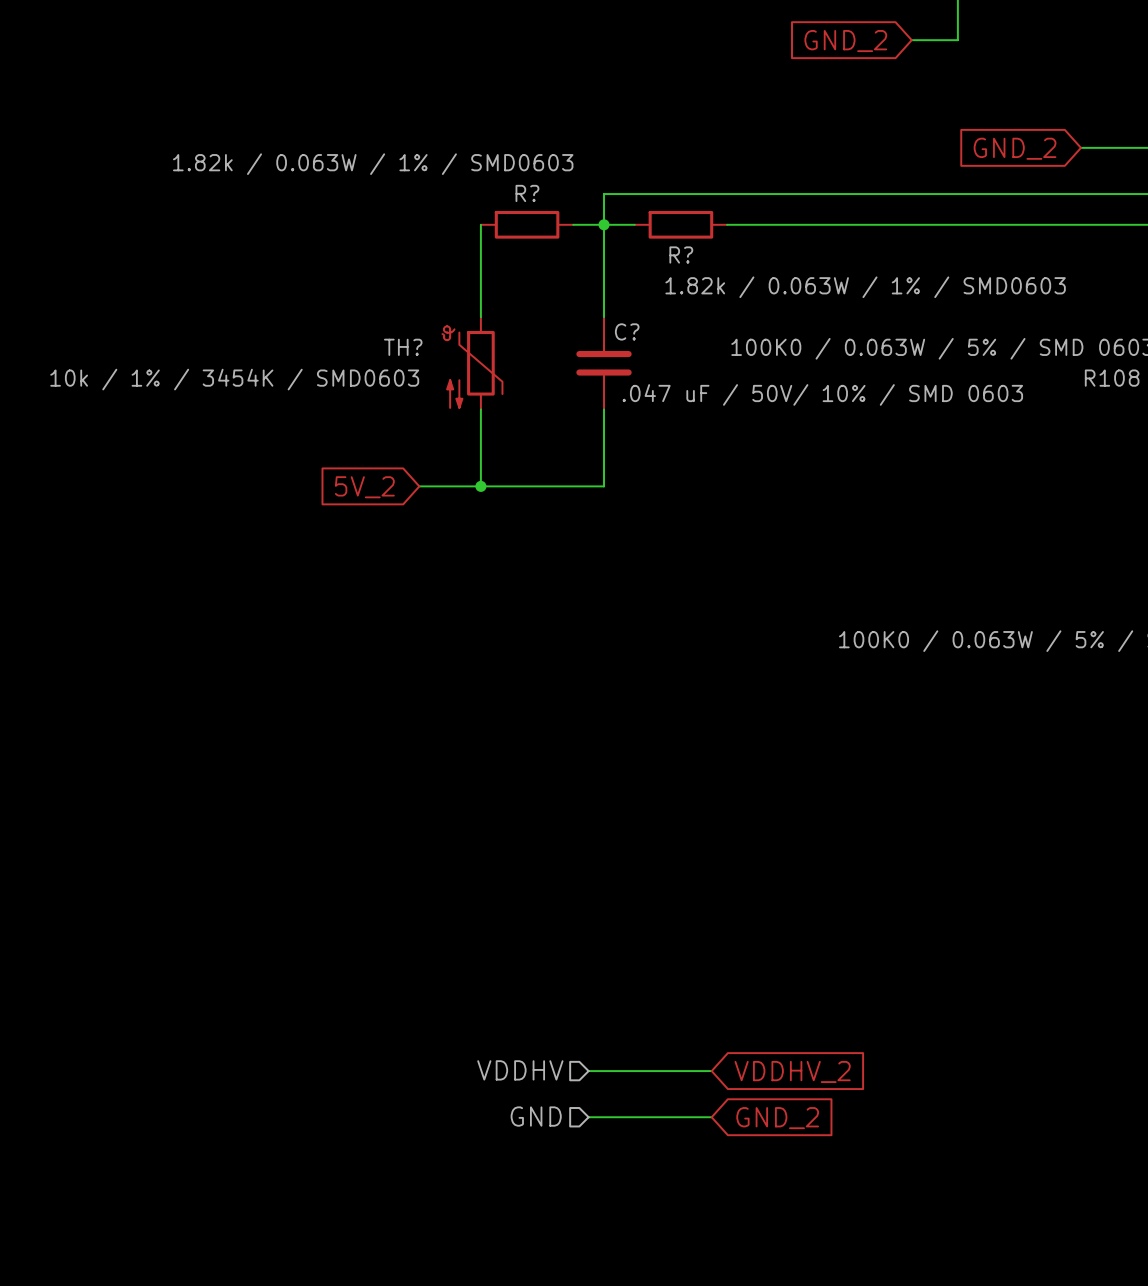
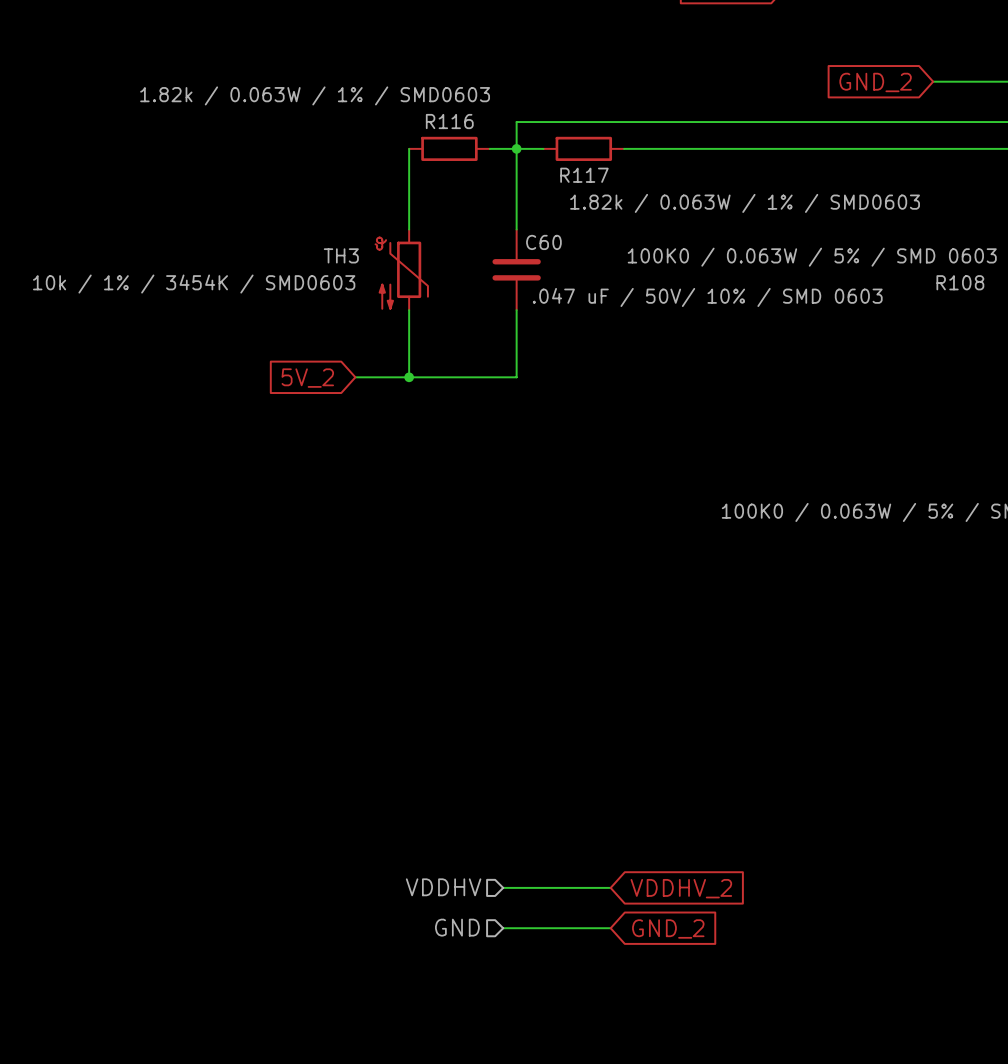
R? name: R? (527, 193) -> R116 (449, 121)
R? name: R? (681, 255) -> R117 (584, 175)
C? name: C? (627, 331) -> C60 (543, 242)
TH? name: TH? (403, 347) -> TH3 (341, 255)

